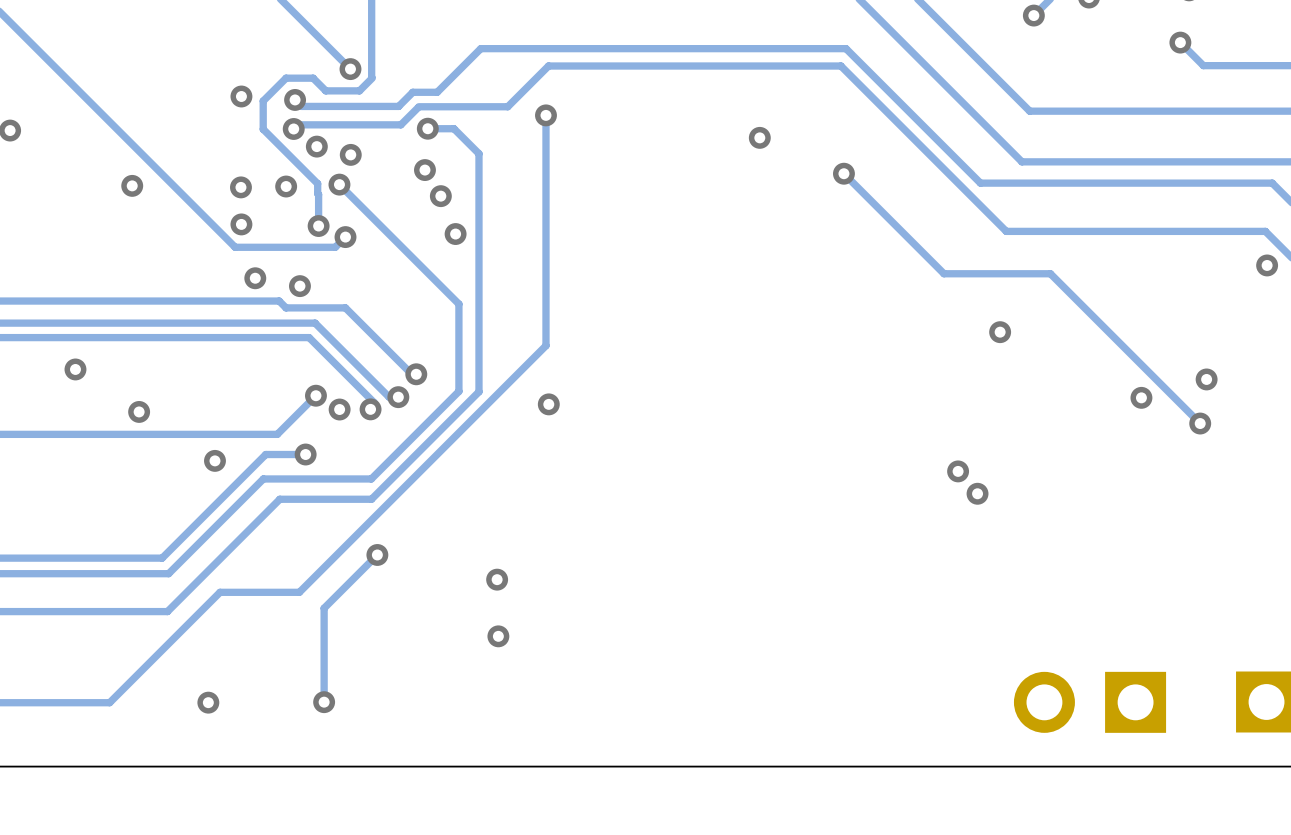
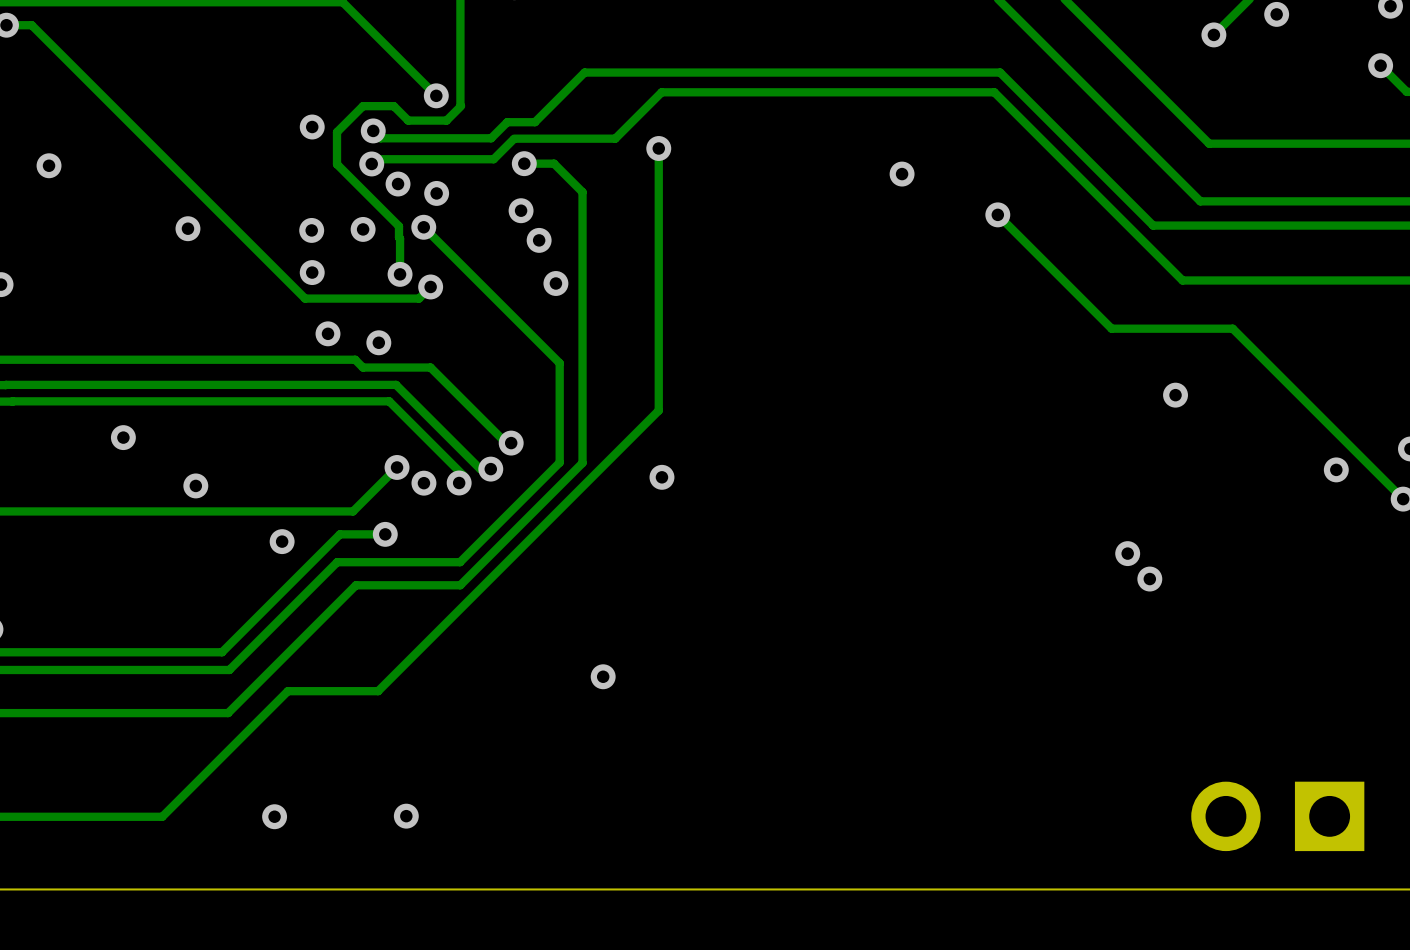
track: (377, 554) (324, 608) (324, 702) -> none
via: (377, 554) -> none
via: (498, 636) -> none

